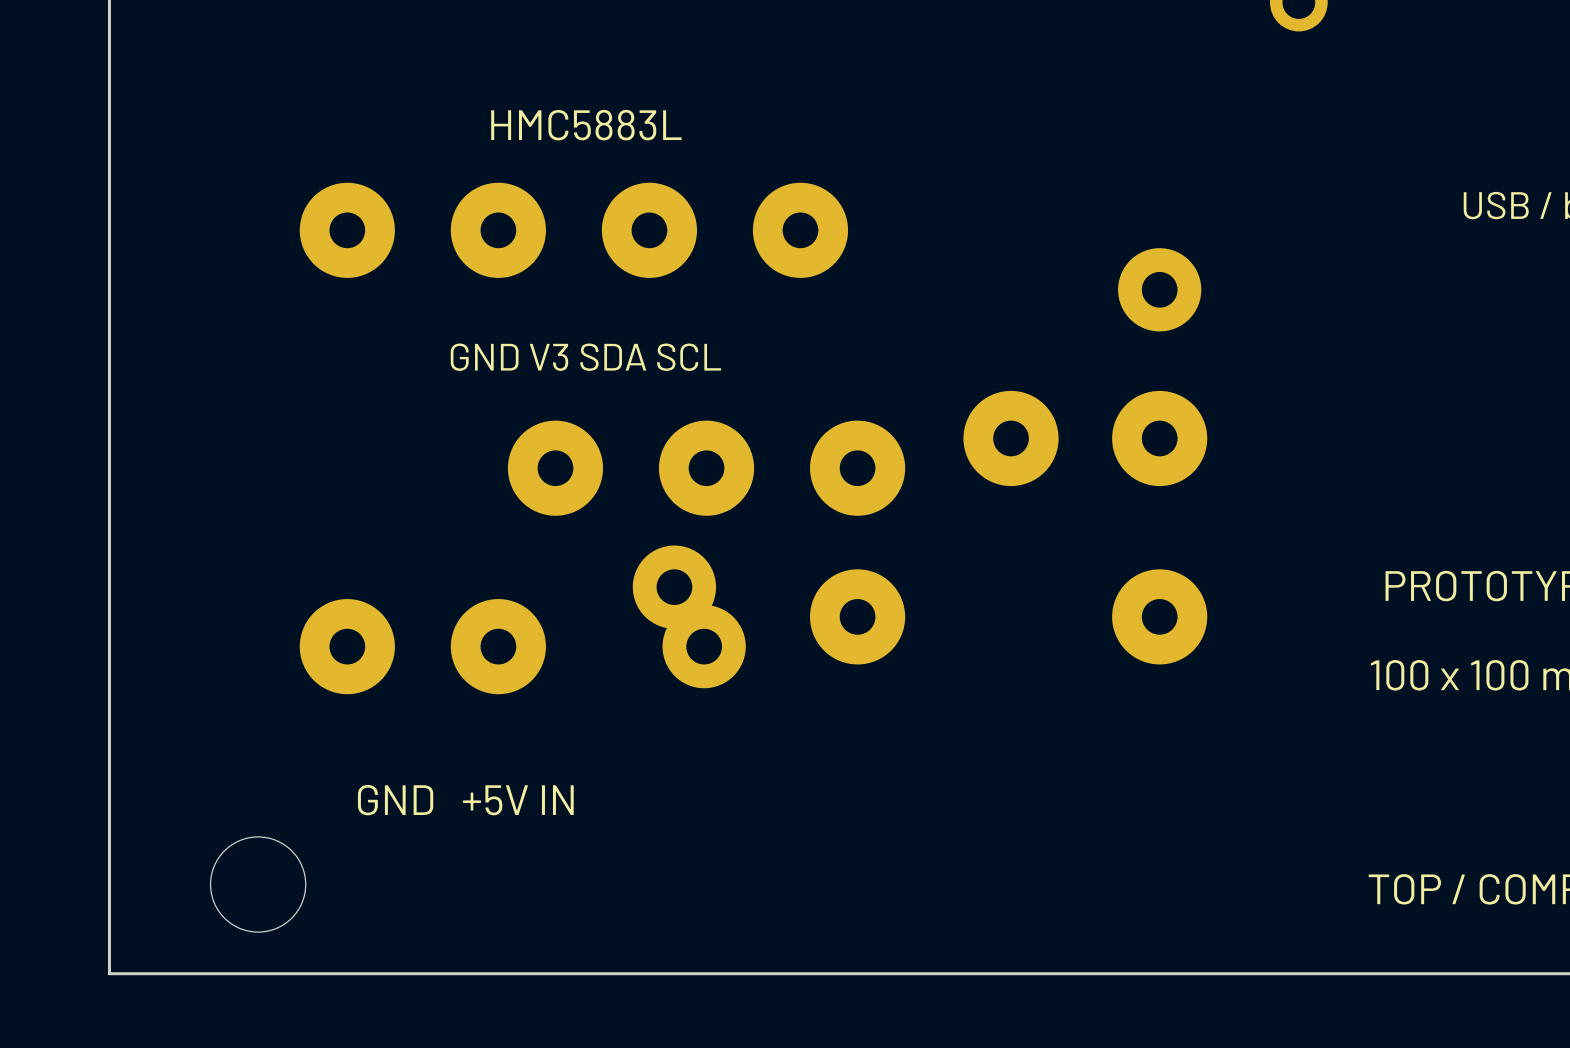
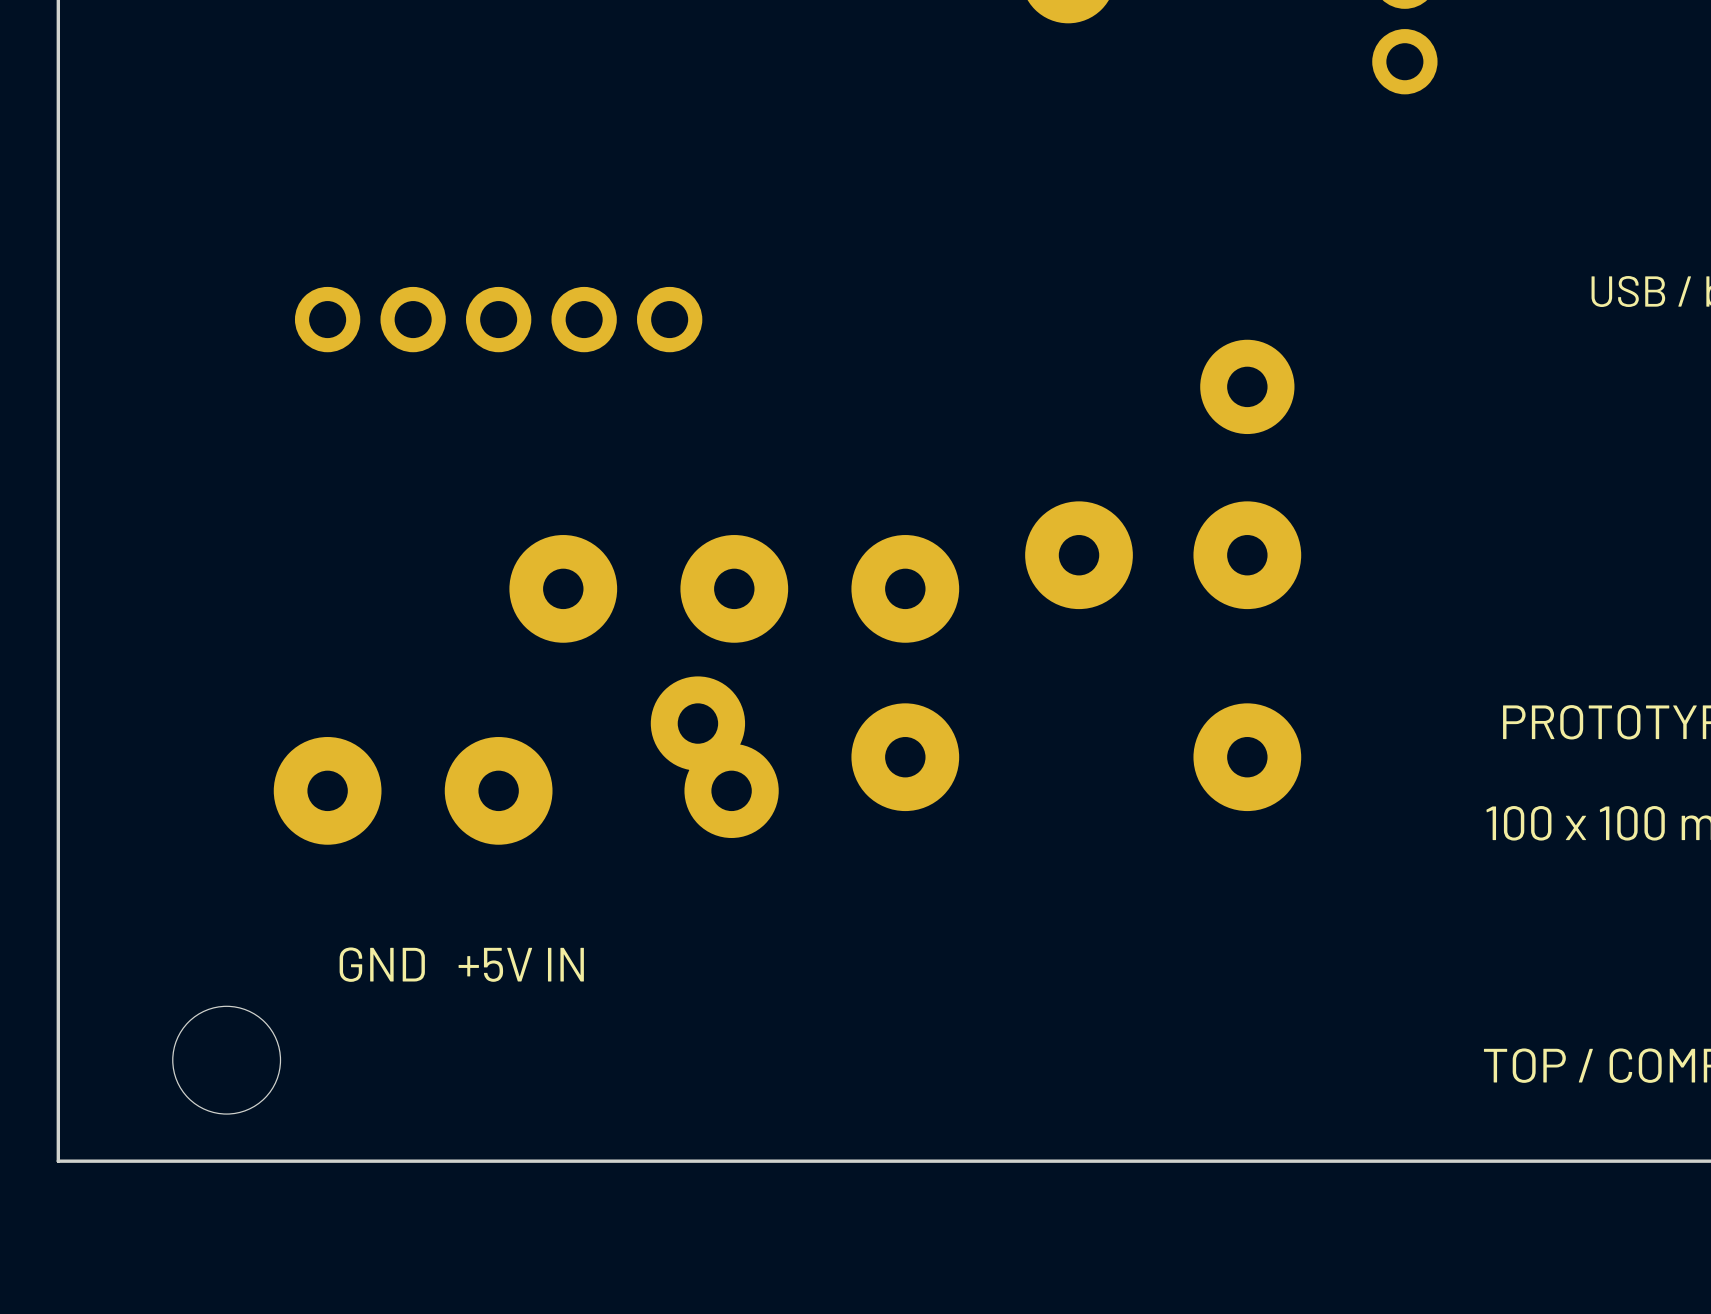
text: HMC5883L (586, 125) -> none
part: none -> (498, 319)
part: (573, 230) -> none
text: GND V3 SDA SCL (585, 357) -> none

